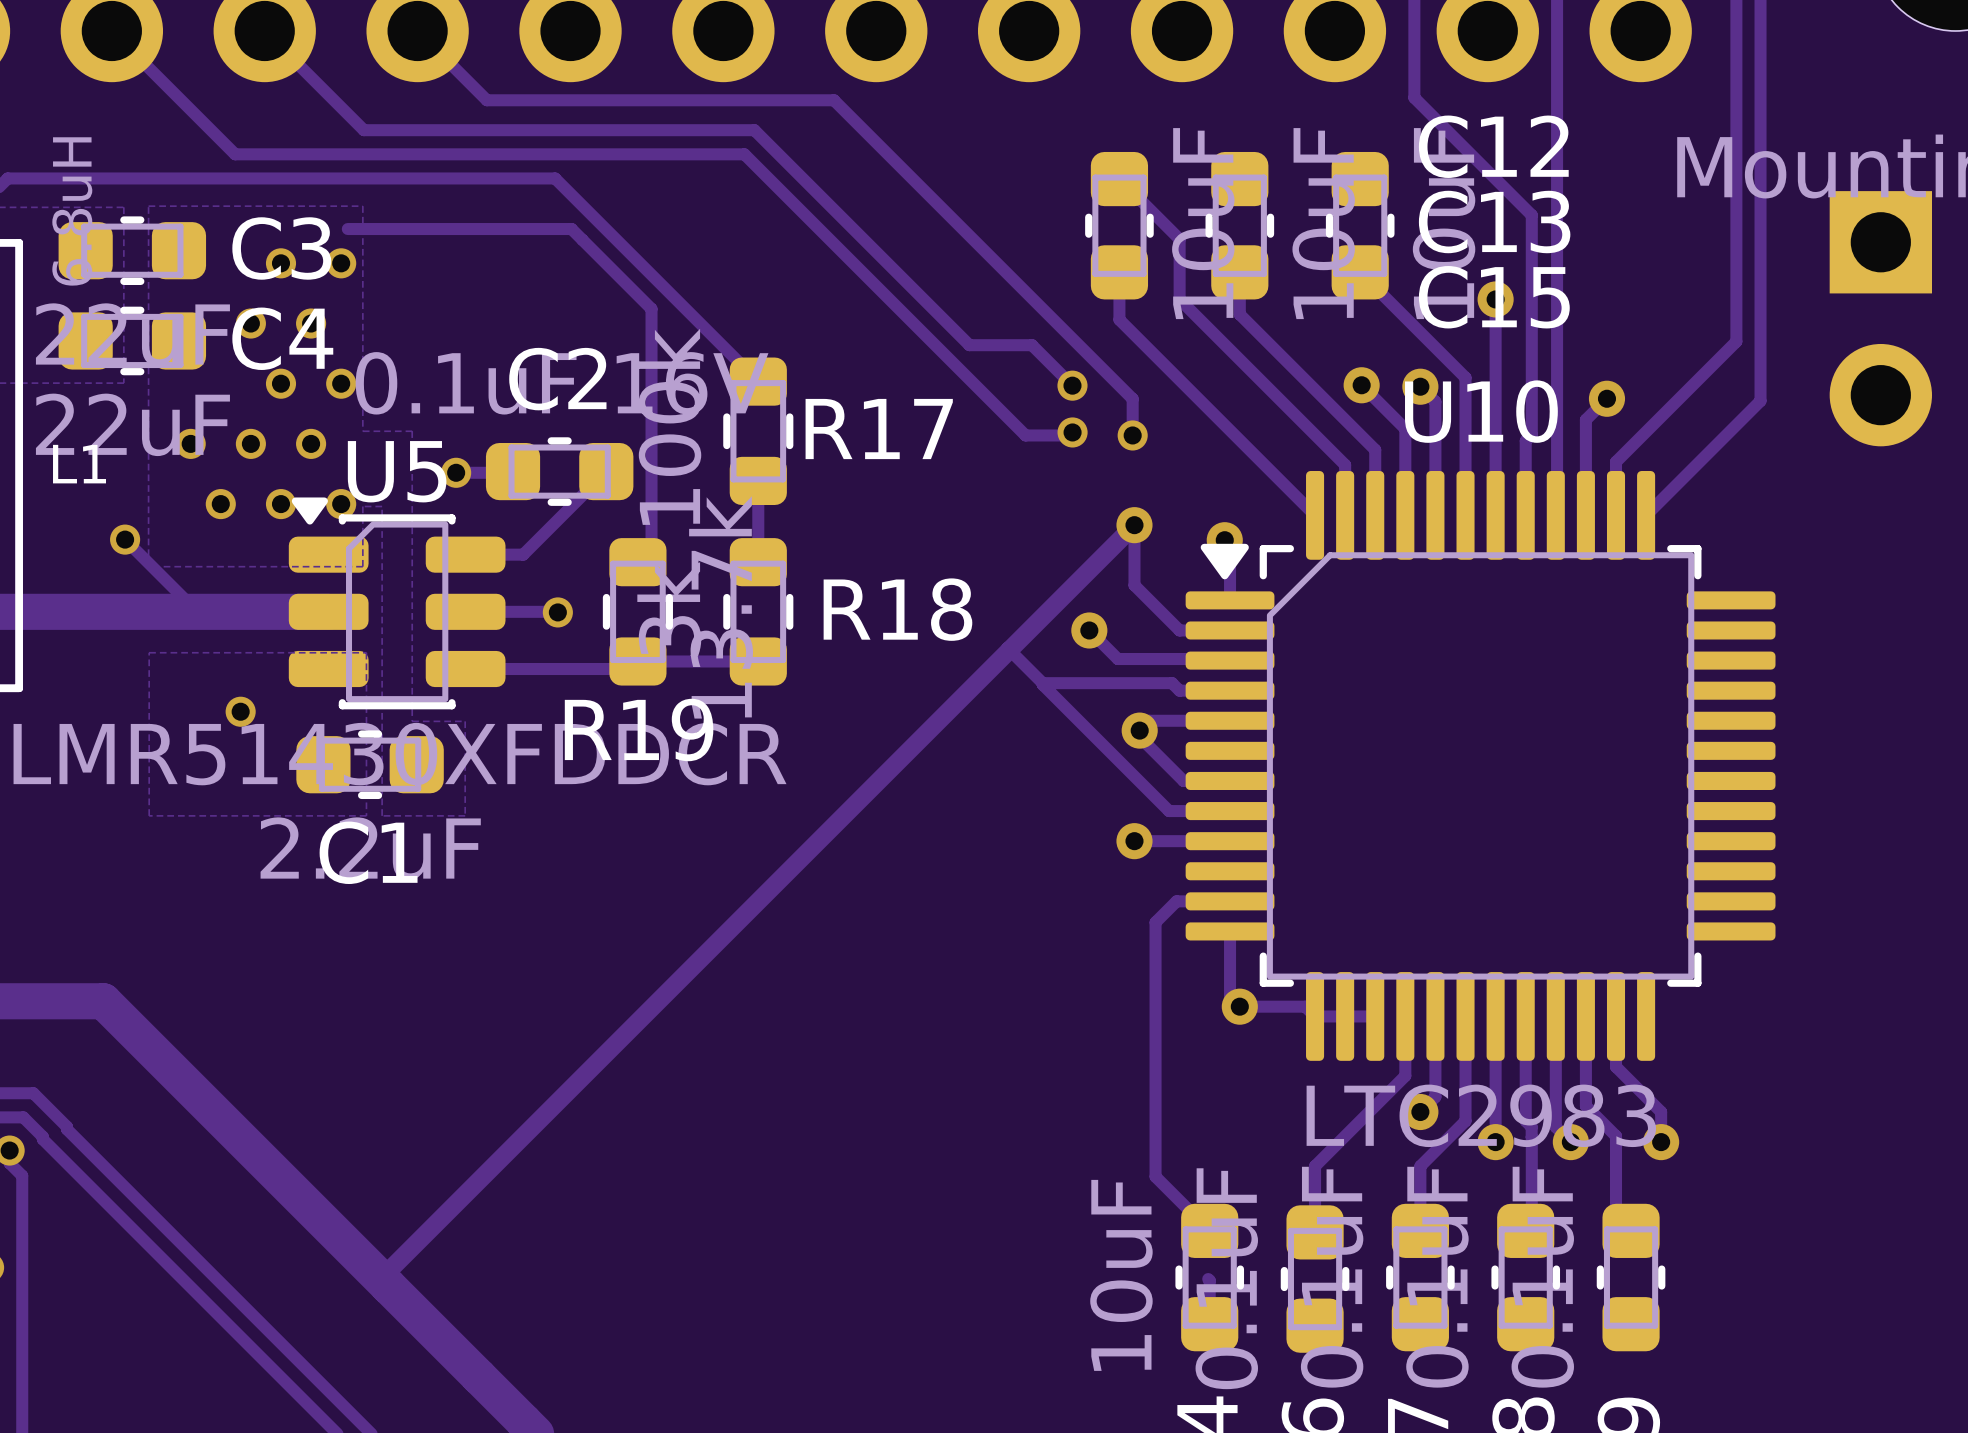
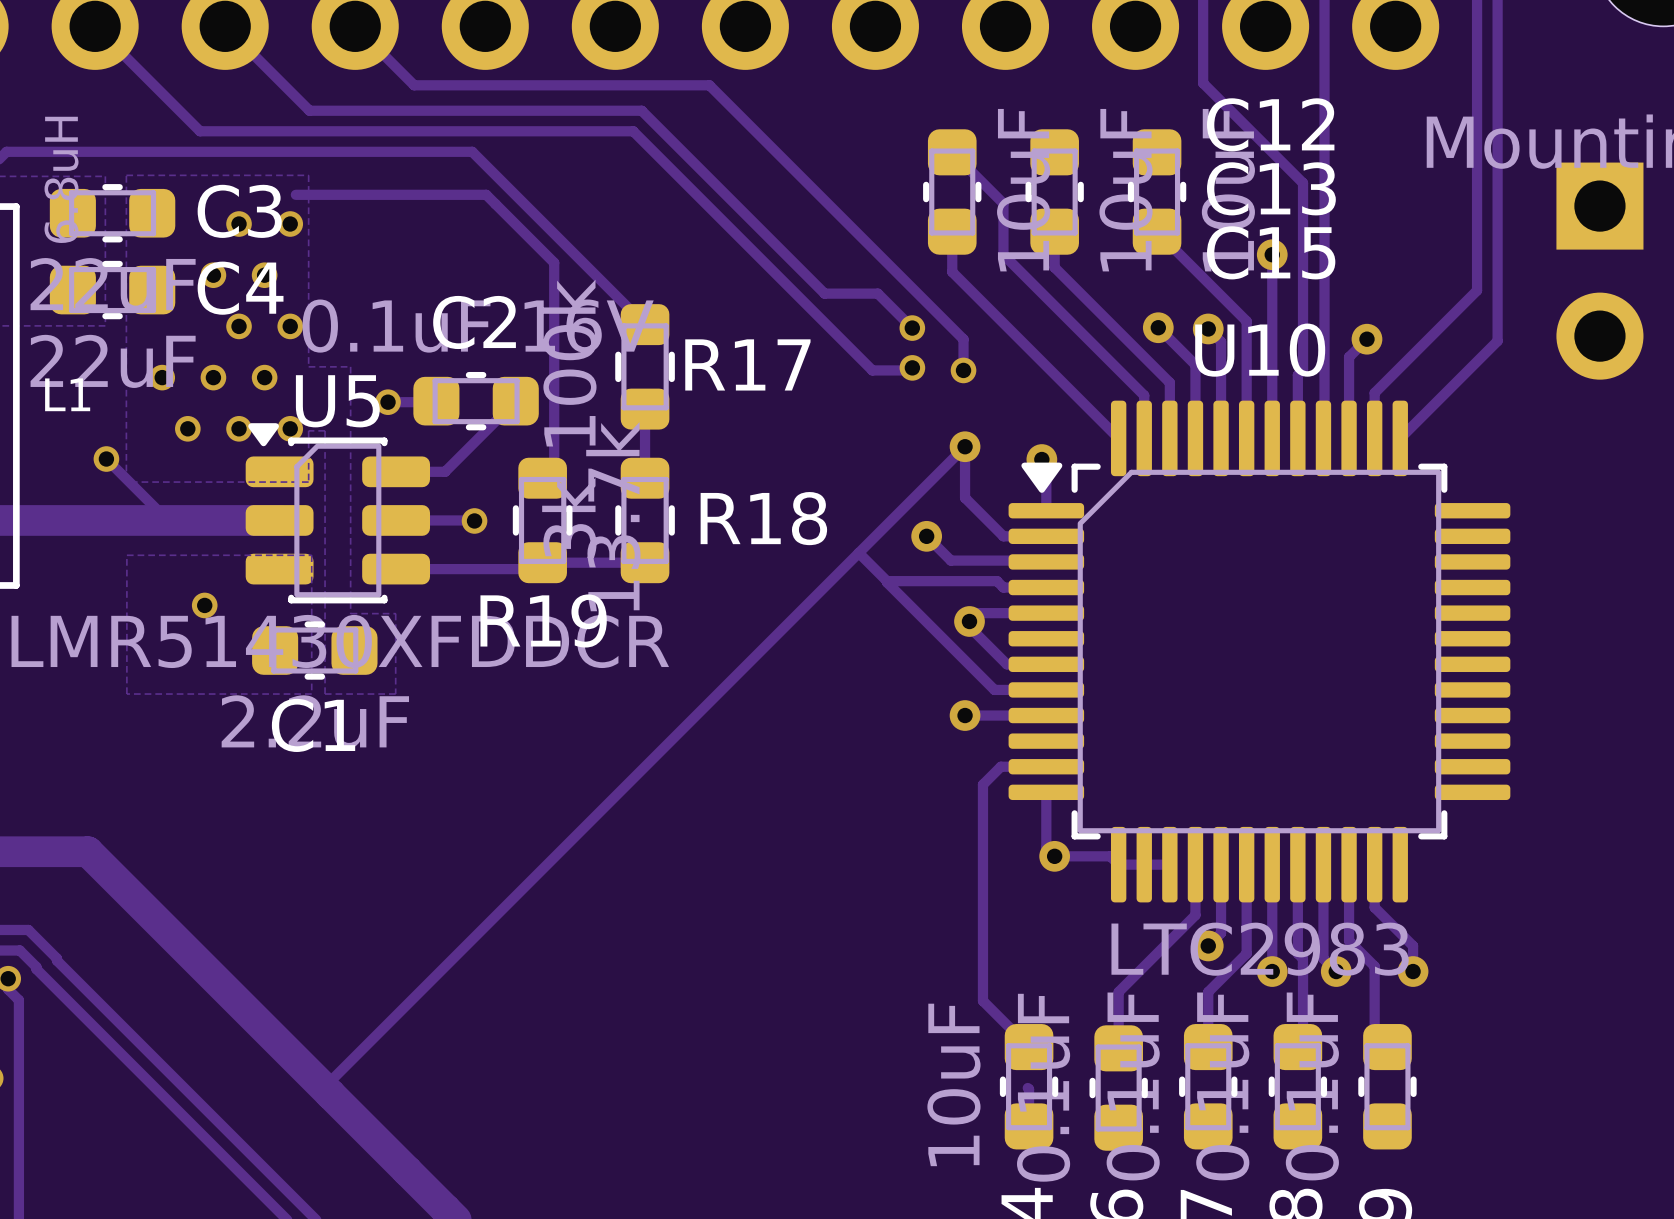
track width: thick (1134, 525) (388, 1271) -> thin (965, 446) (330, 1081)

